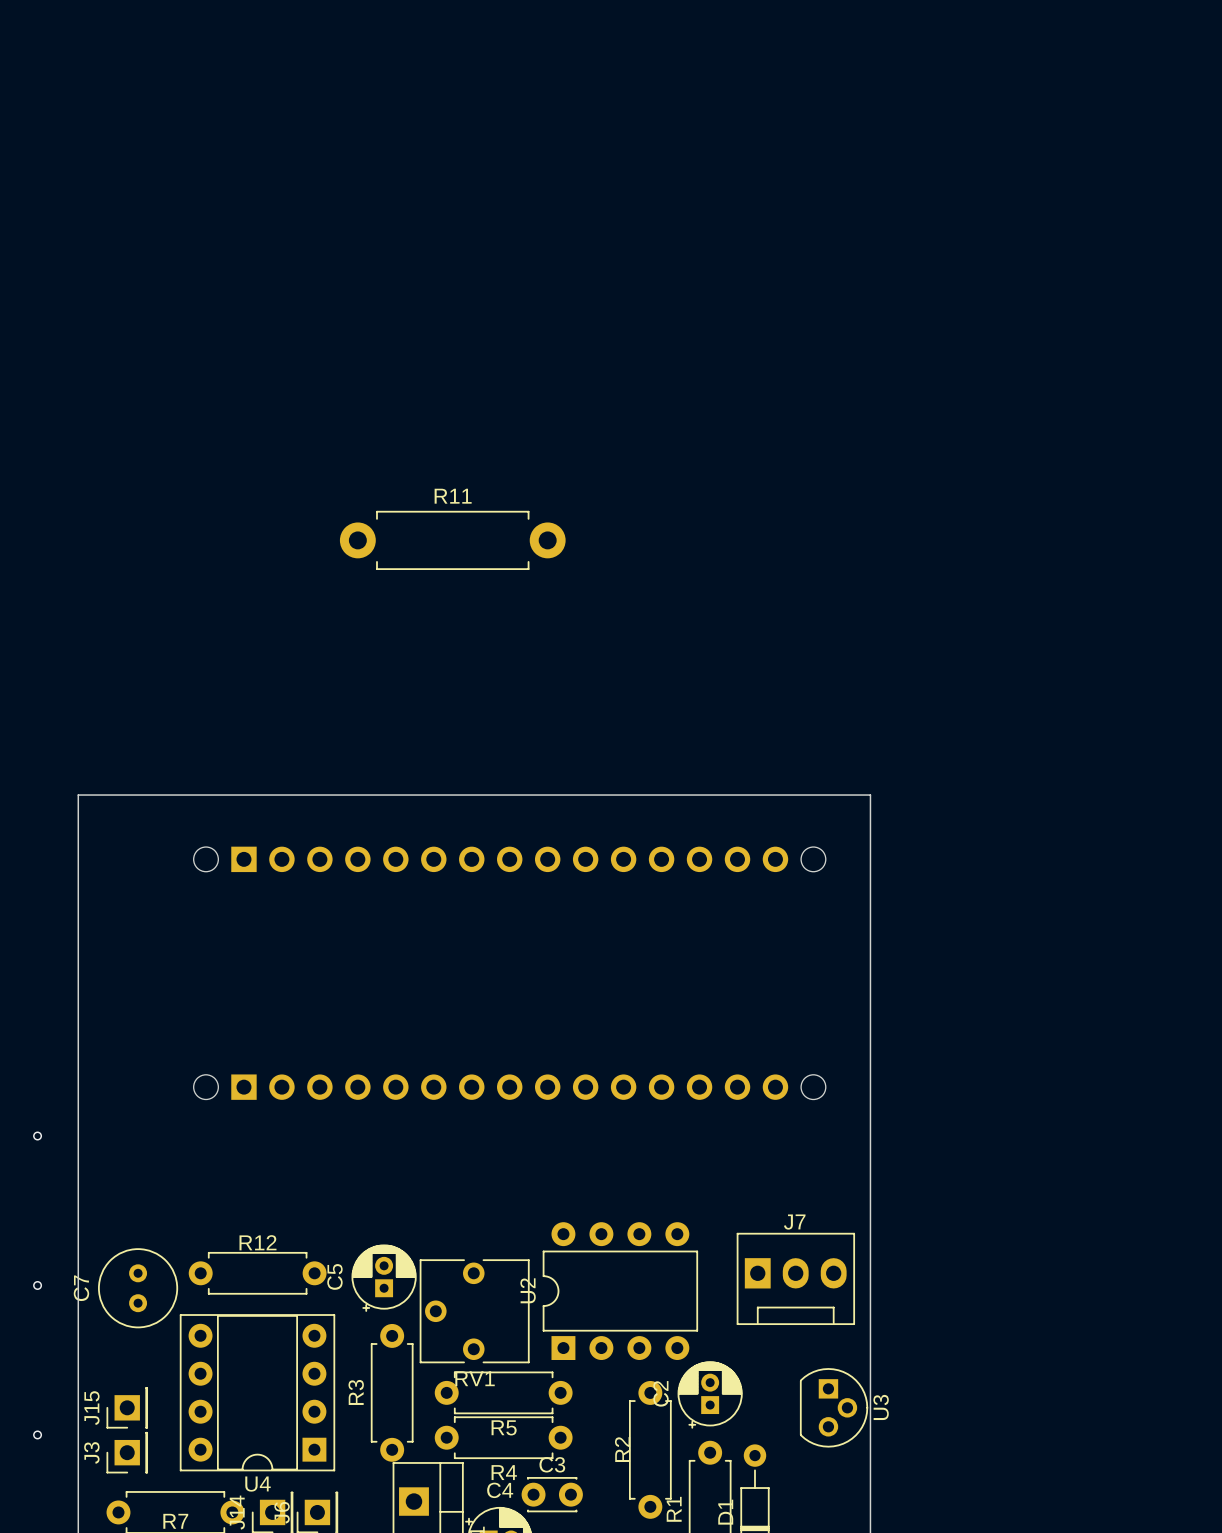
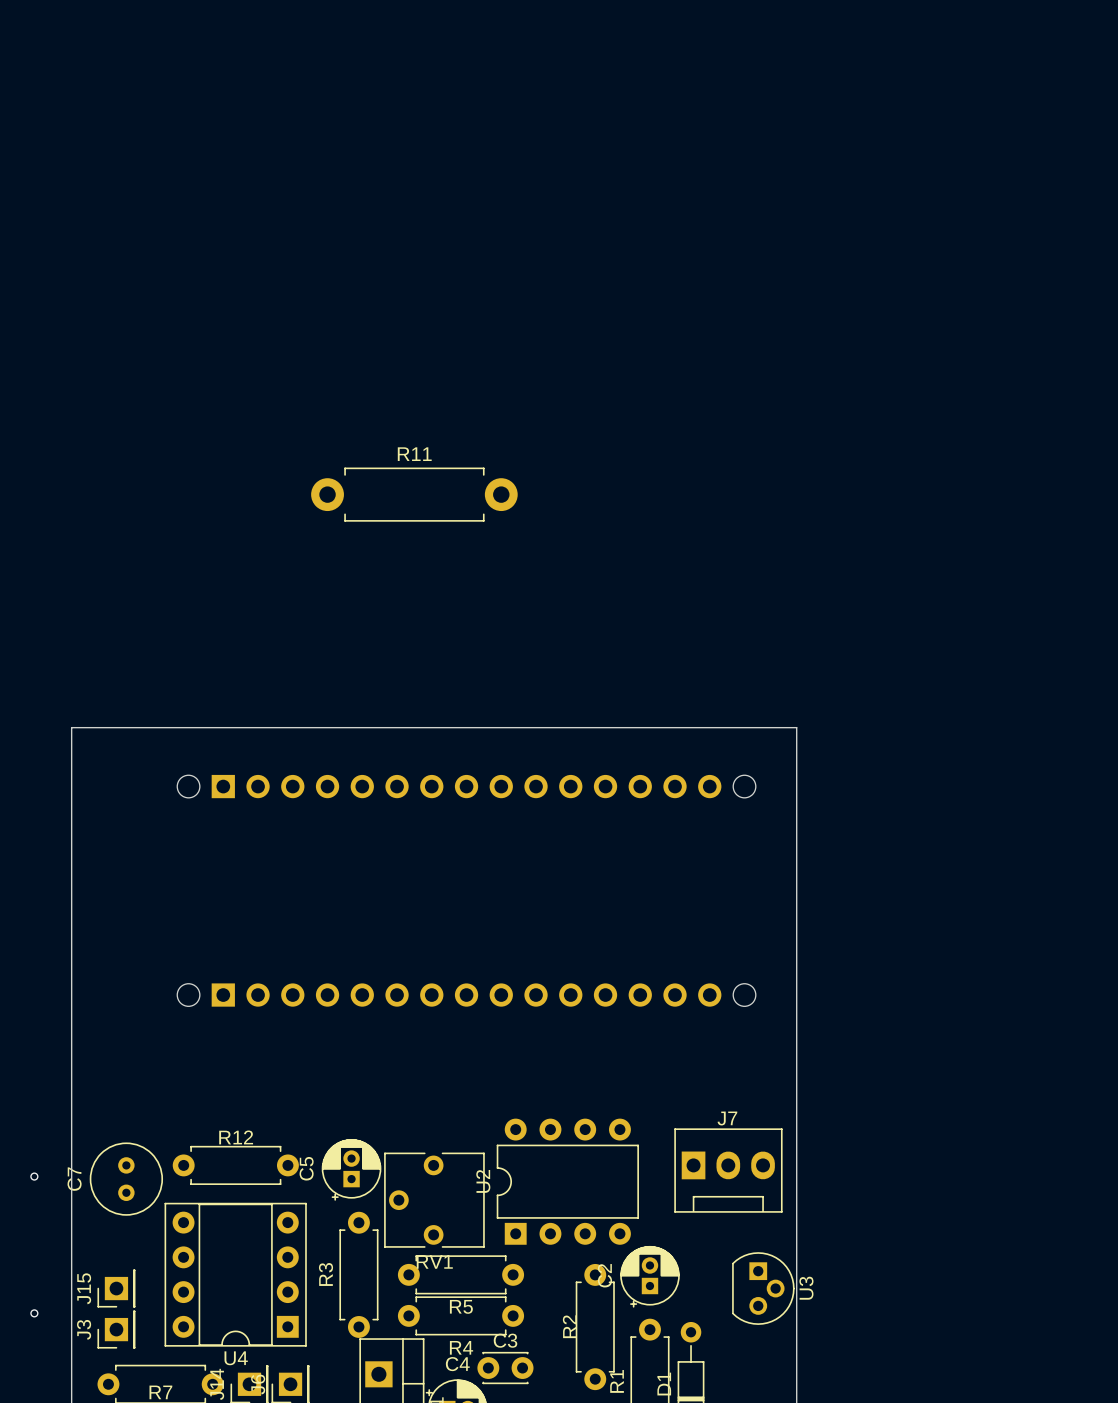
via: (37, 1136) -> none

